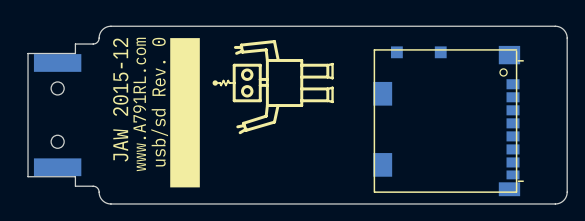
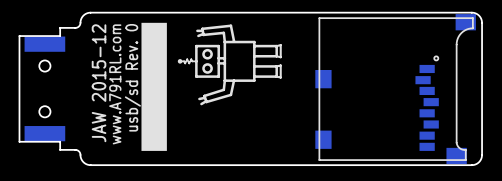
part: none -> (395, 89)
part: (449, 121) -> none

